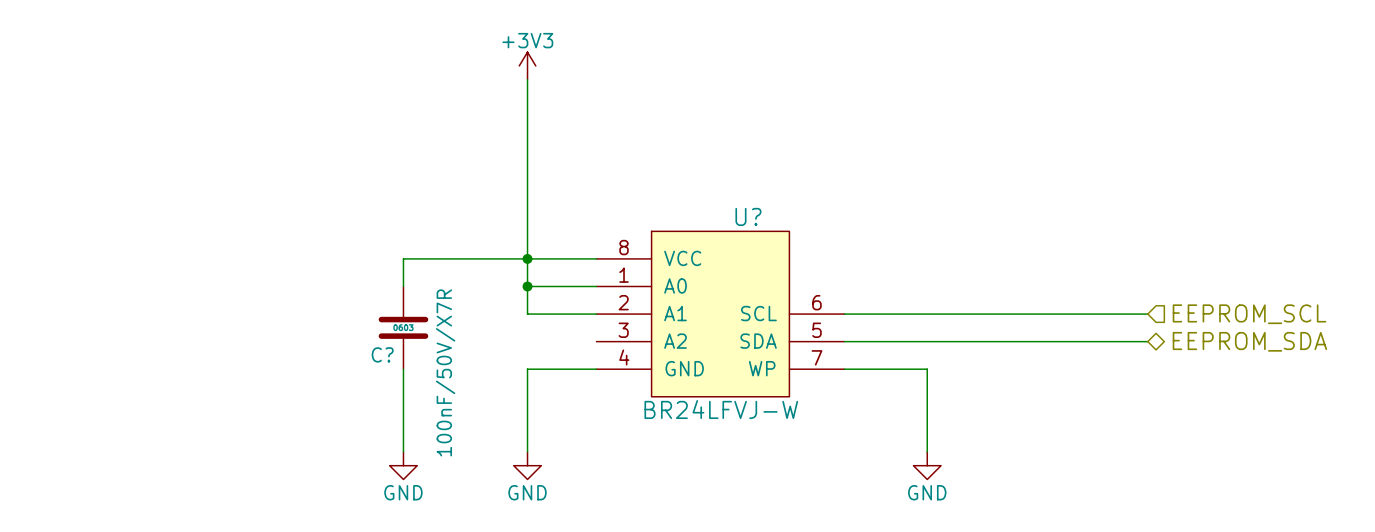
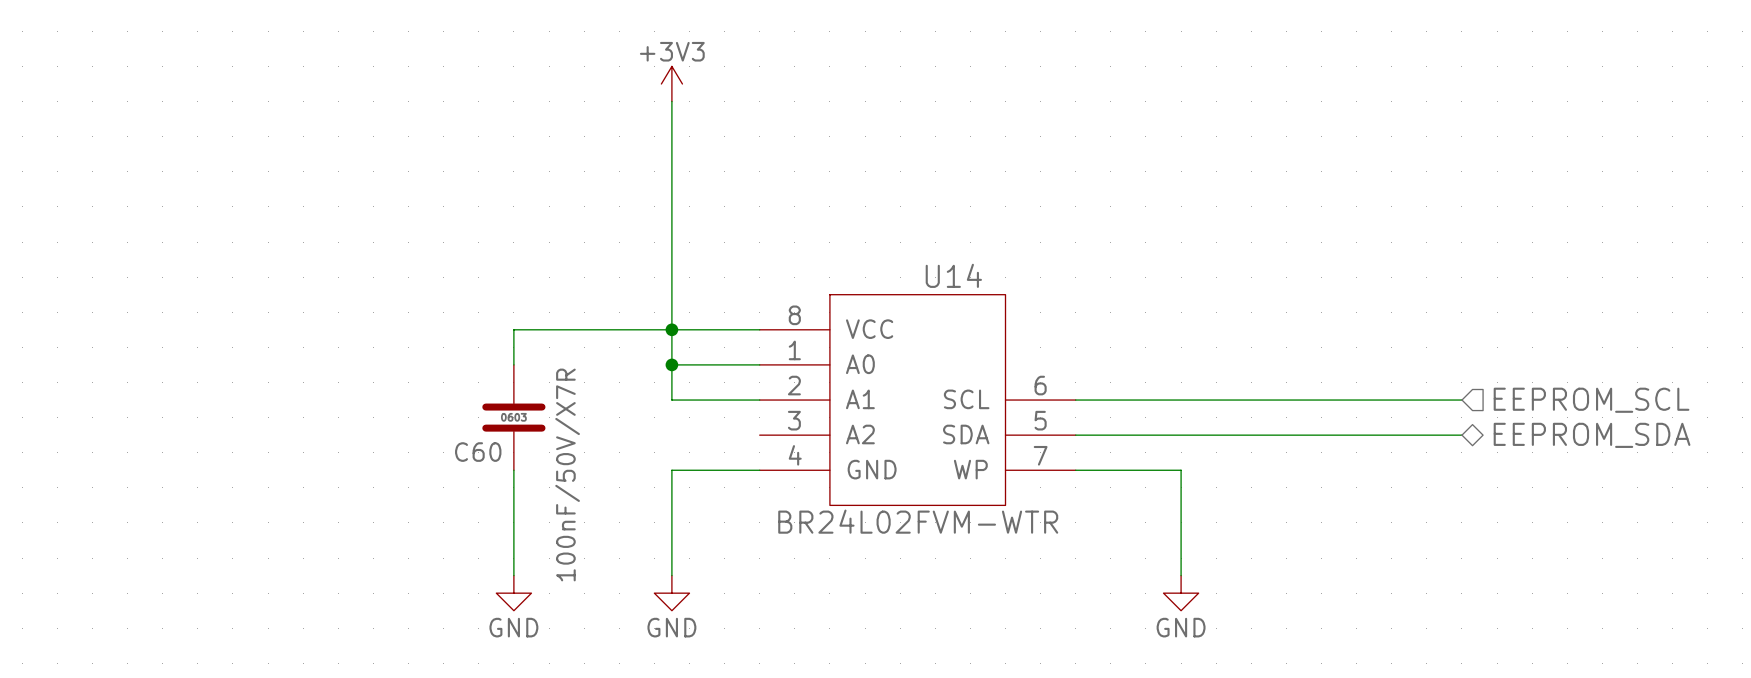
U? name: U? (748, 216) -> U14 (953, 275)
C? name: C? (382, 354) -> C60 (478, 452)
U? value: BR24LFVJ-W (721, 409) -> BR24L02FVM-WTR (918, 521)

